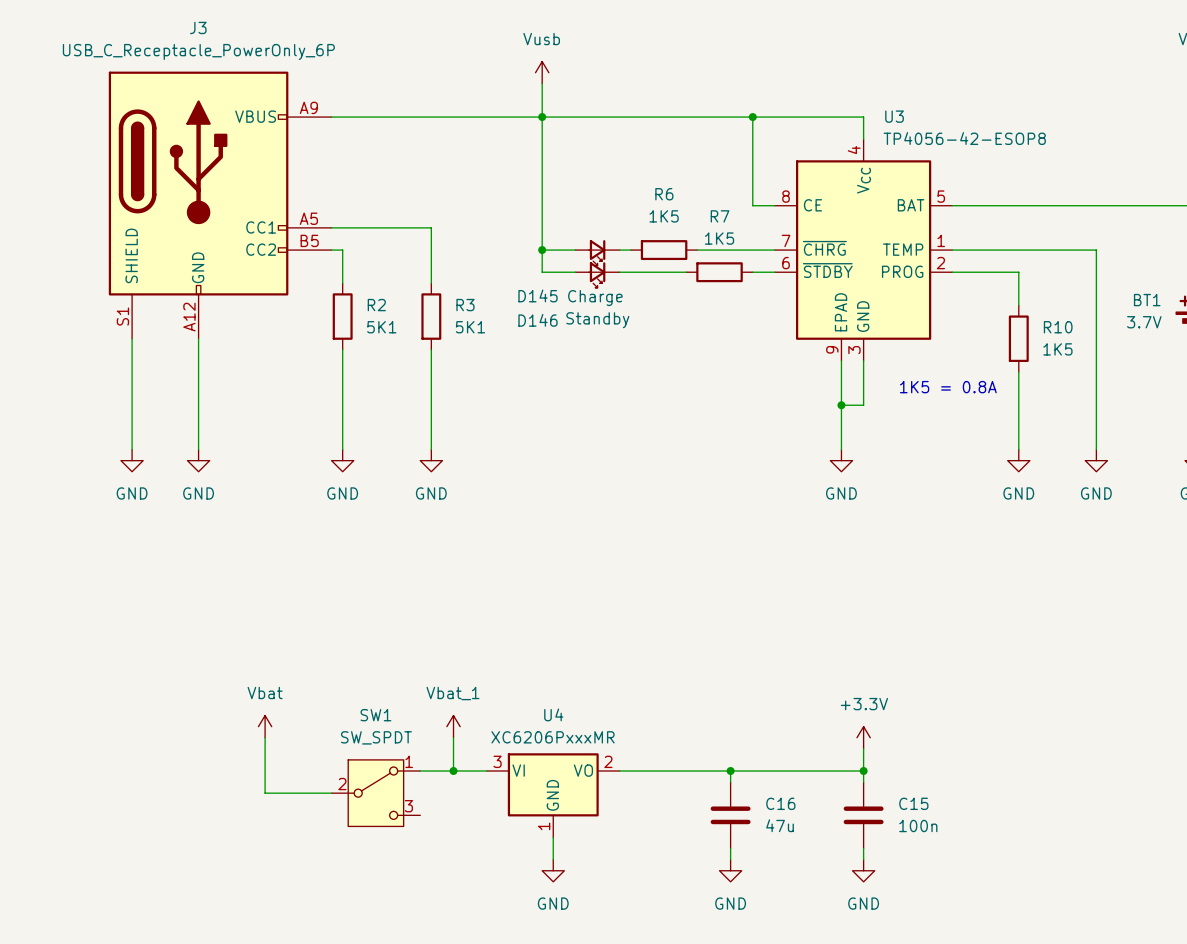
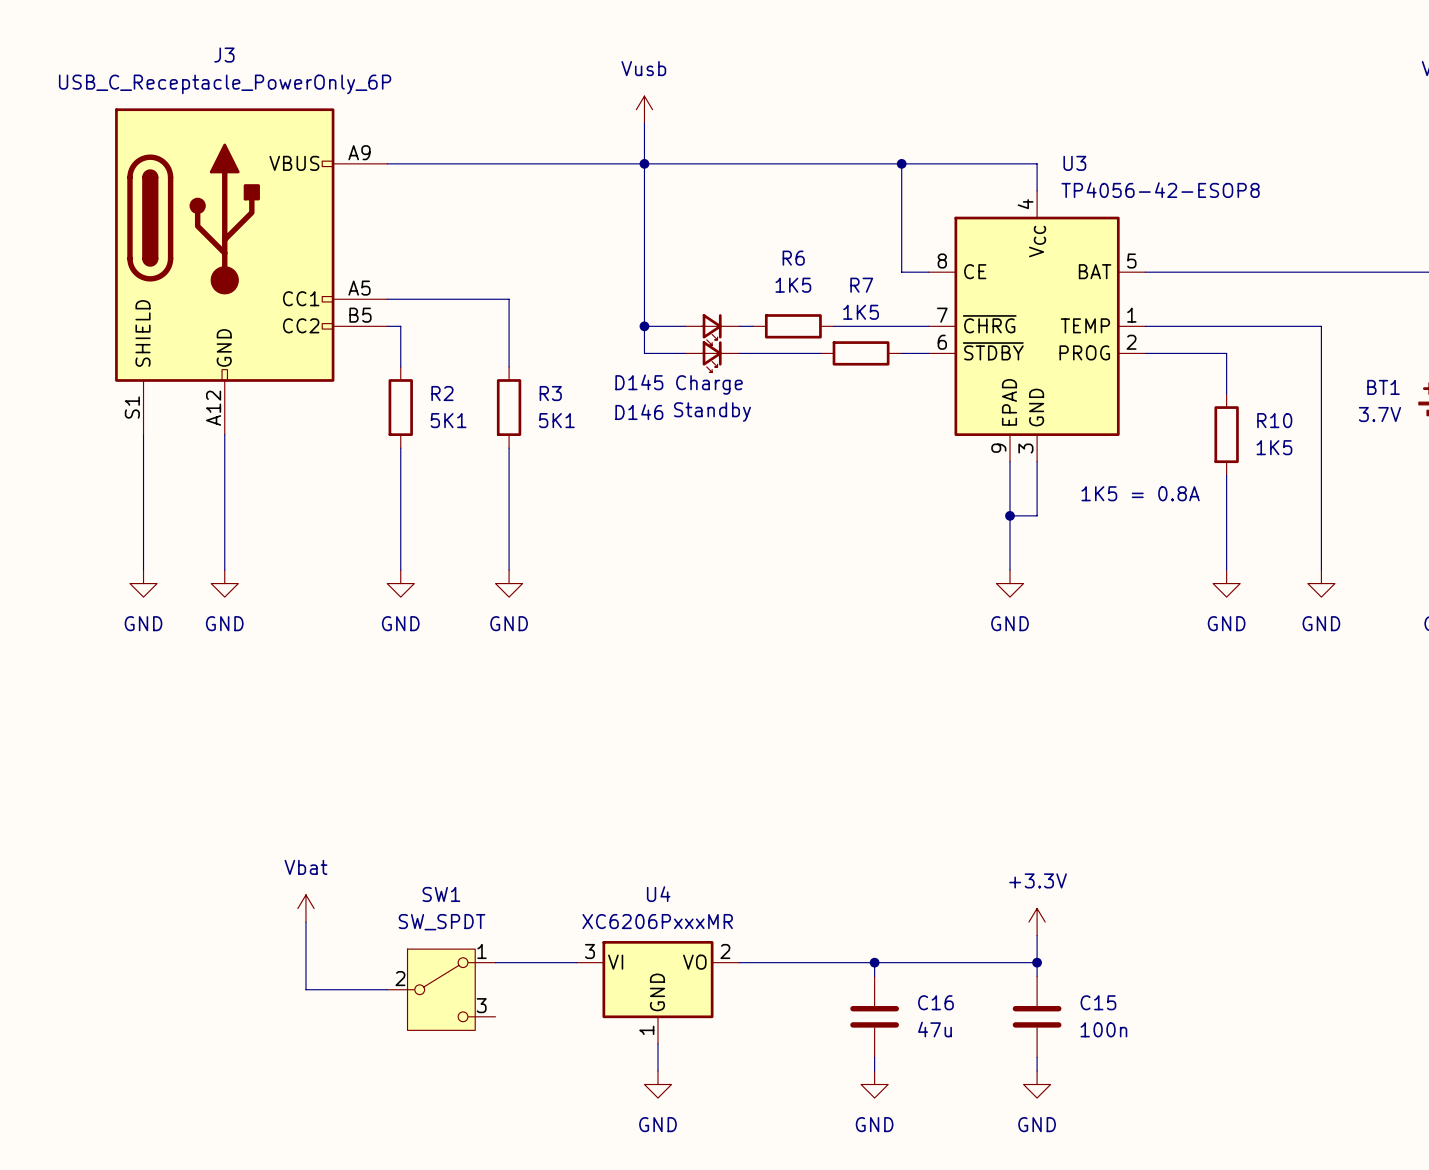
power symbol: Vbat_1 (453, 726) -> none
wire: (453, 737) (453, 771) -> none
junction: (453, 771) -> none

